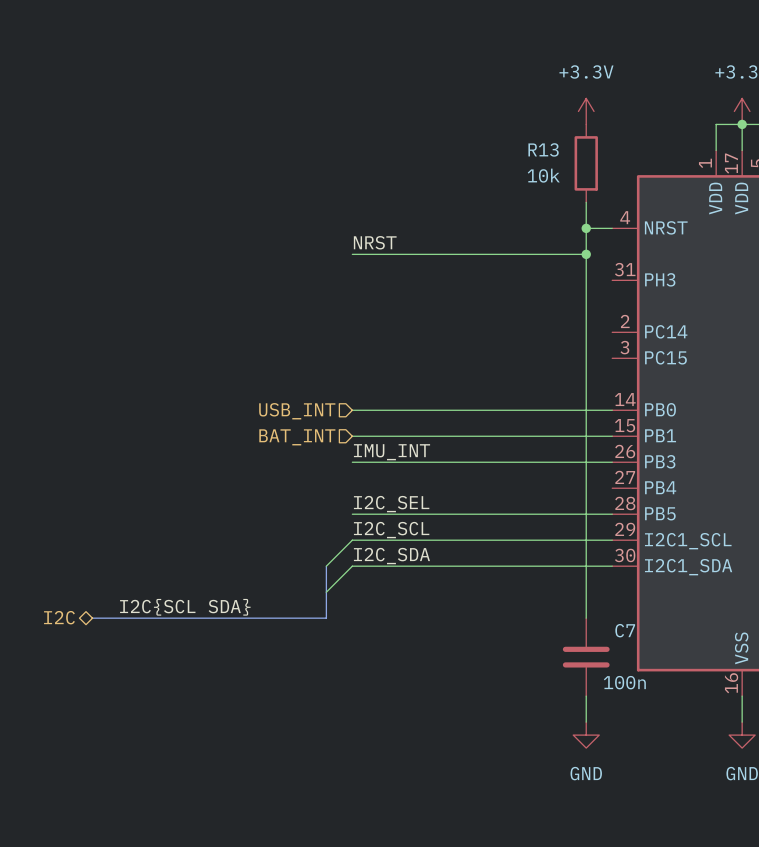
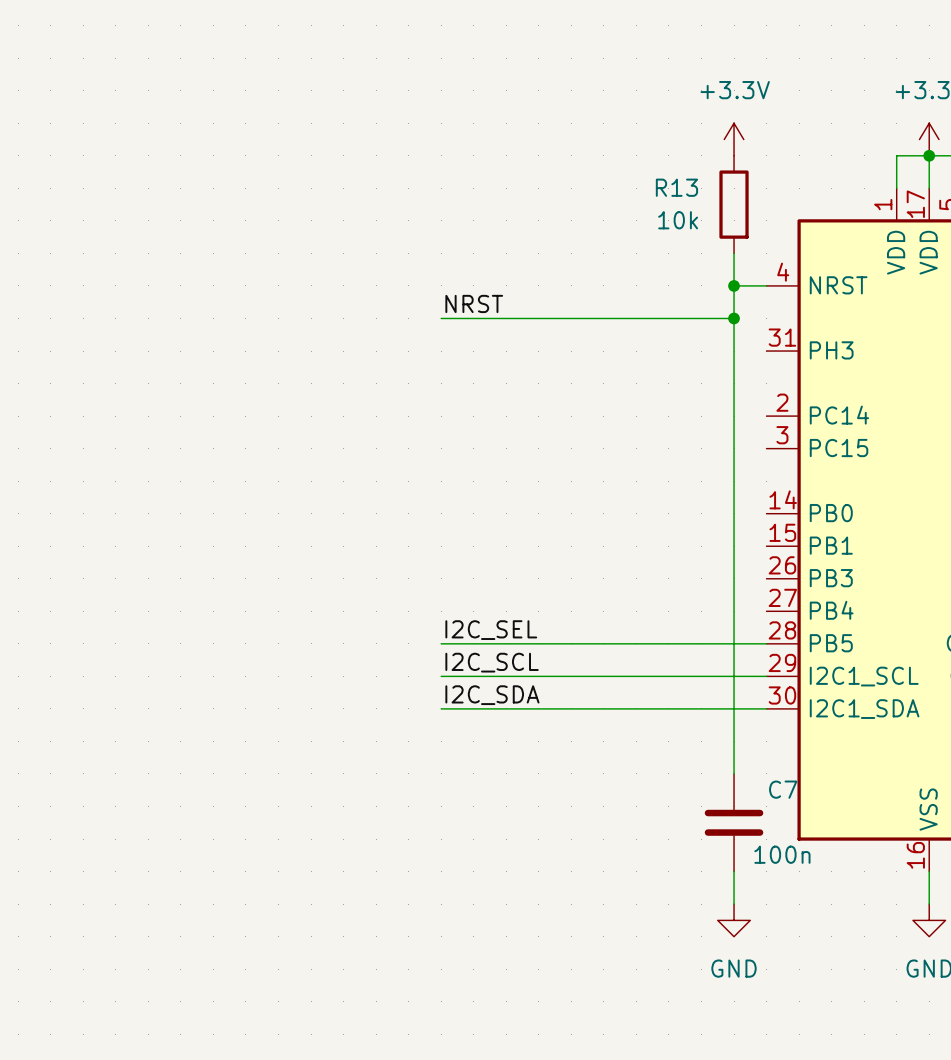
wire: (352, 410) (612, 410) -> none
hierarchical label: USB_INT (297, 411) -> none
wire: (352, 436) (612, 436) -> none
hierarchical label: BAT_INT (297, 437) -> none
label: IMU_INT (392, 452) -> none
wire: (352, 462) (612, 462) -> none
wire: (352, 540) (326, 566) -> none
bus: (326, 566) (326, 618) (92, 618) -> none
wire: (352, 566) (326, 592) -> none
label: I2C{SCL SDA} (185, 607) -> none
hierarchical label: I2C (59, 617) -> none

